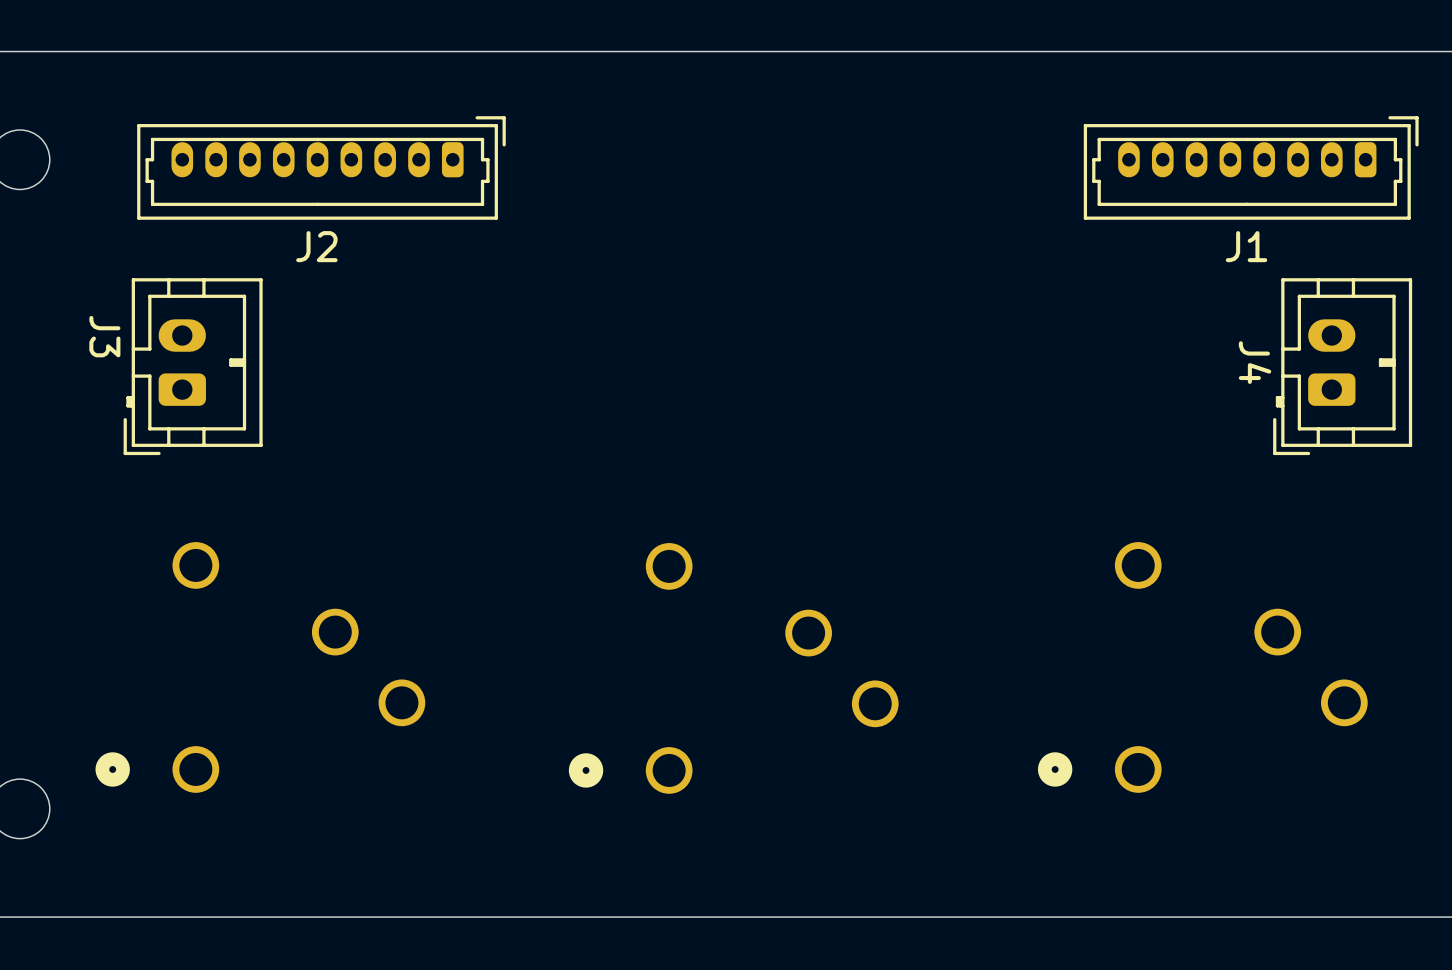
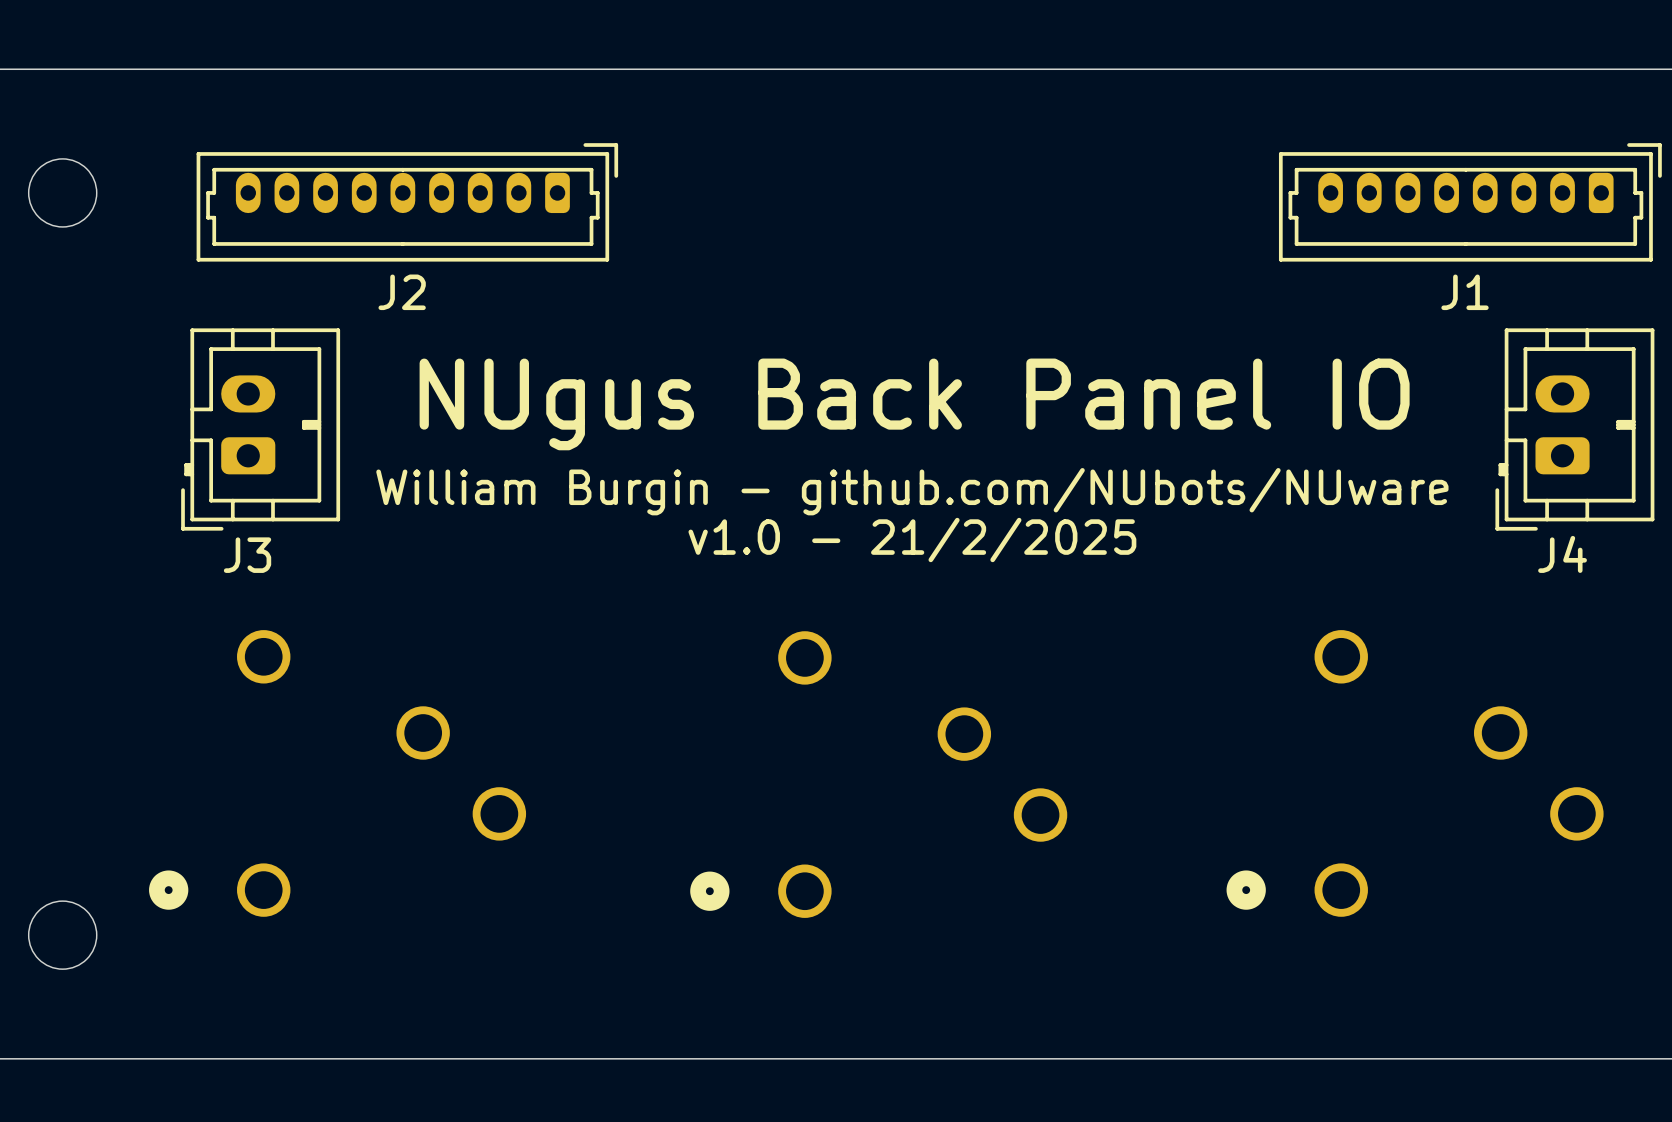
J3 name rotation: 0° (104, 336) -> 90° counterclockwise (247, 555)
J3 name position: J3 (104, 336) -> J3 (247, 555)
text: none -> NUgus Back Panel IO (914, 404)
J4 name rotation: 0° (1255, 362) -> 90° counterclockwise (1562, 554)
J4 name position: J4 (1255, 362) -> J4 (1562, 554)
text: none -> William Burgin - github.com/NUbots/NUware (912, 491)
text: none -> v1.0 - 21/2/2025 (912, 540)

